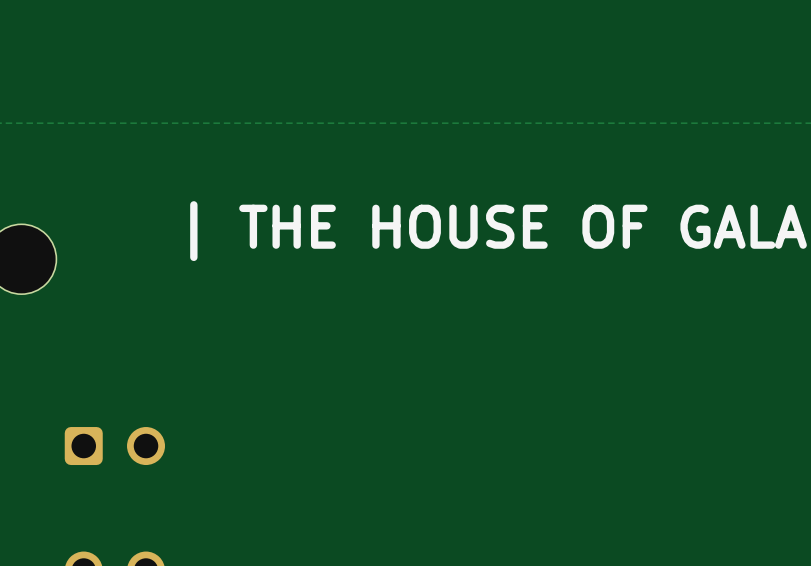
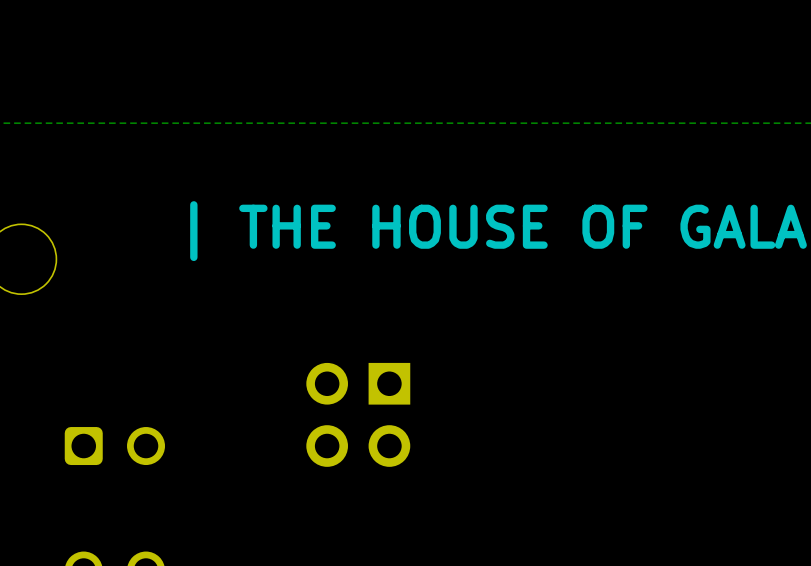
part: none -> (358, 414)

